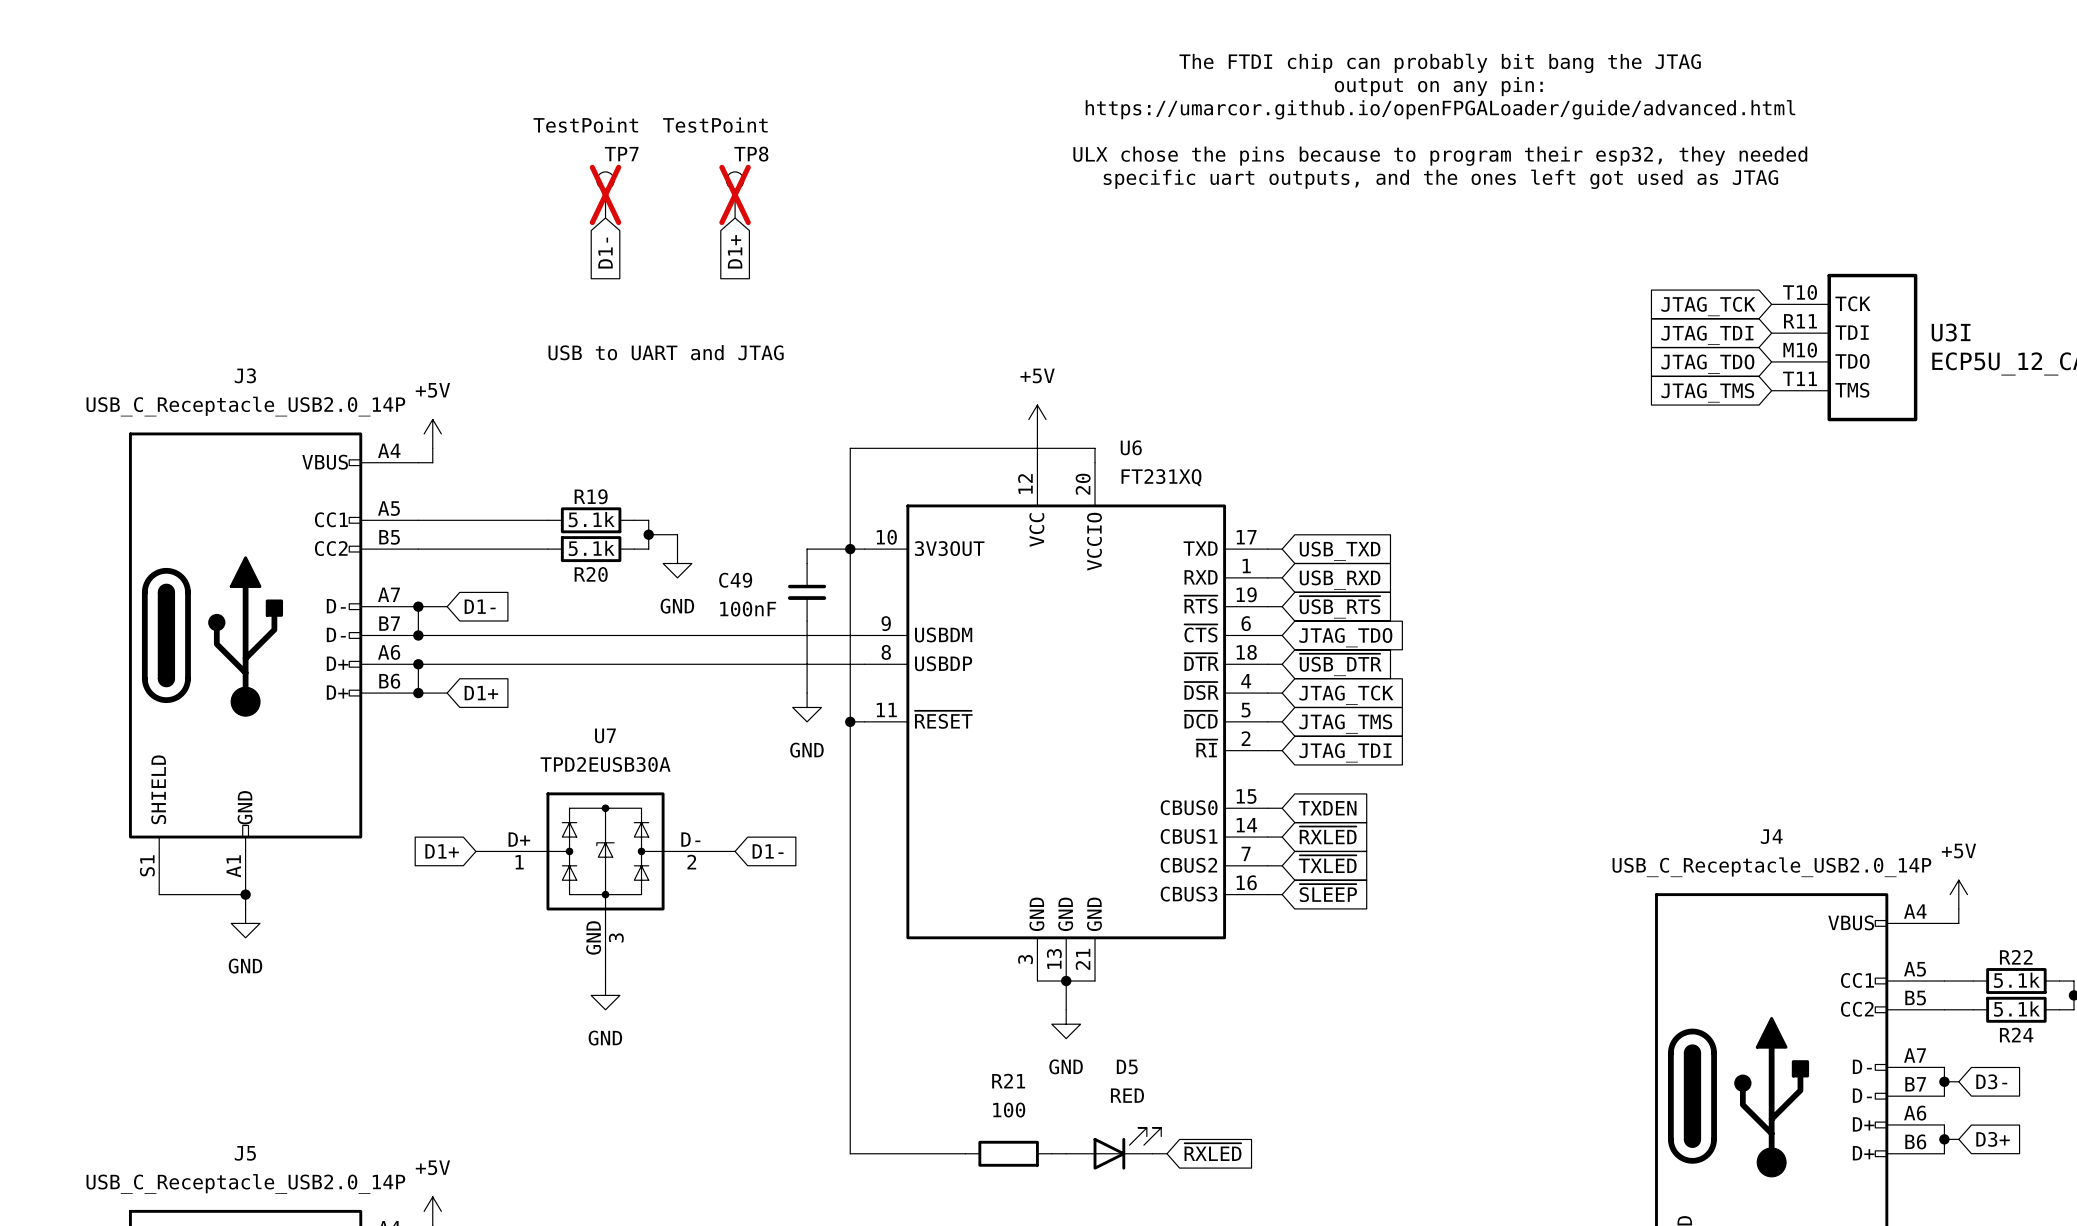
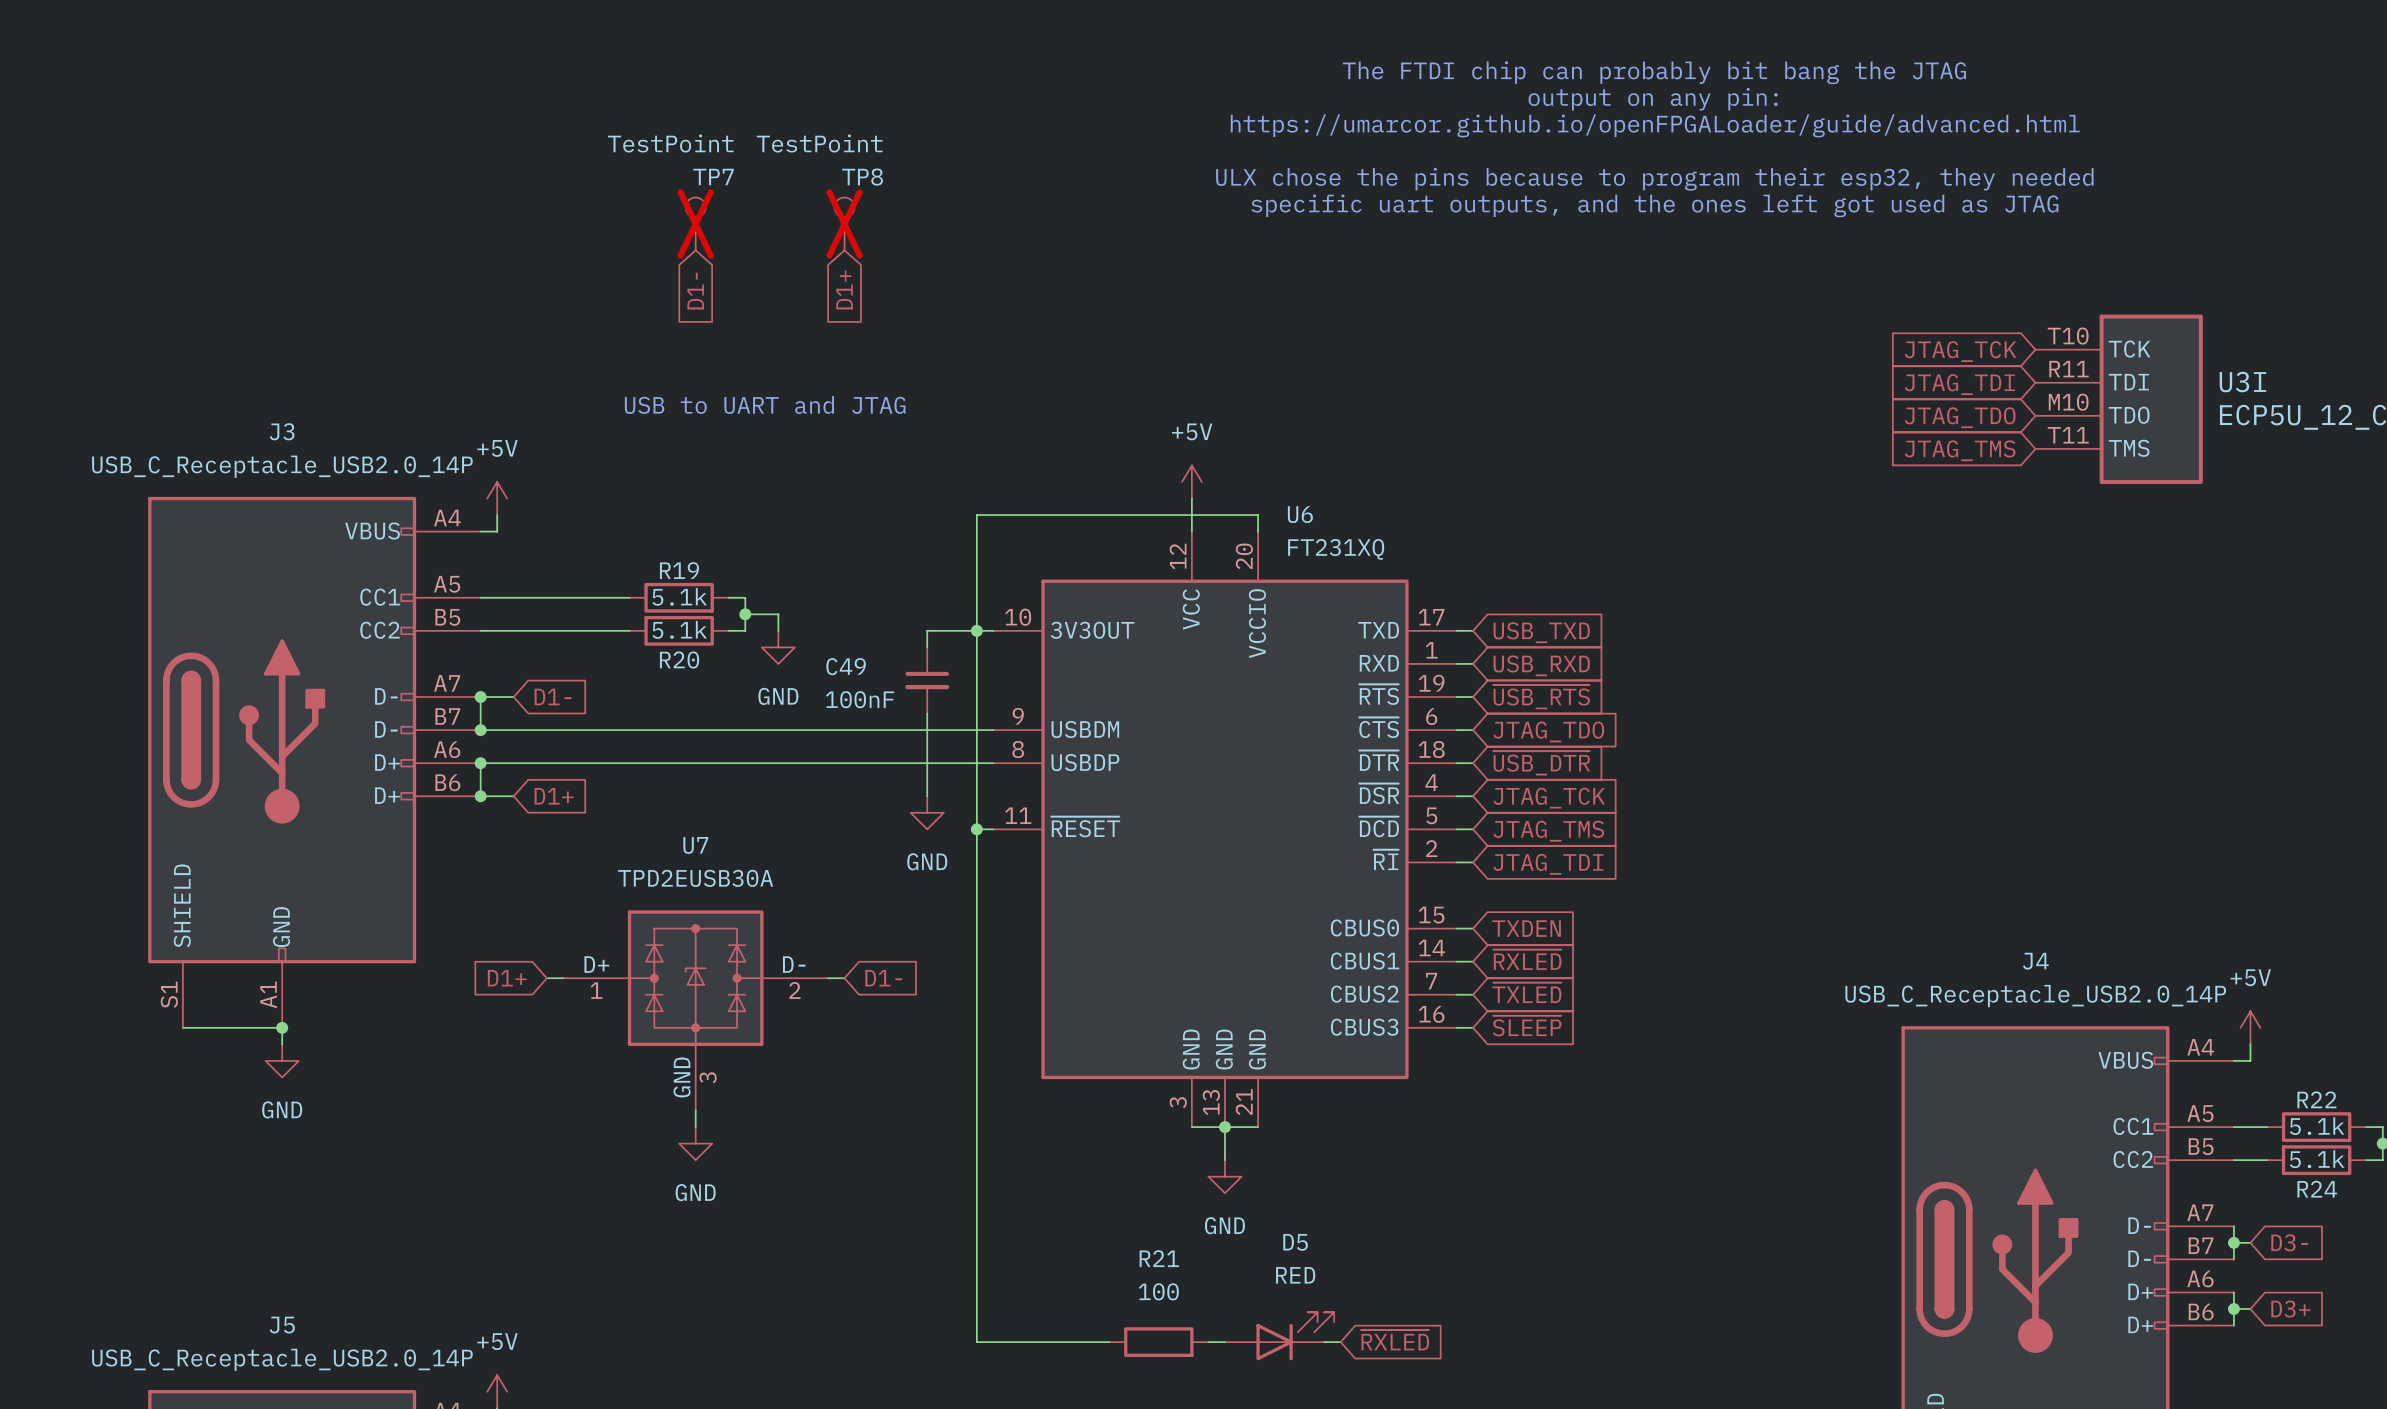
D5 position: (1113, 1148) -> (1279, 1336)
global label position: ~{RXLED} (1212, 1152) -> ~{RXLED} (1395, 1340)
wire: (850, 1153) (965, 1153) -> (976, 1325) (976, 1342) (1109, 1342)
R21 position: (1008, 1153) -> (1158, 1342)
wire: (1051, 1153) (1066, 1153) -> (1208, 1342) (1224, 1342)
wire: (1152, 1153) (1166, 1153) -> (1324, 1342) (1340, 1342)

